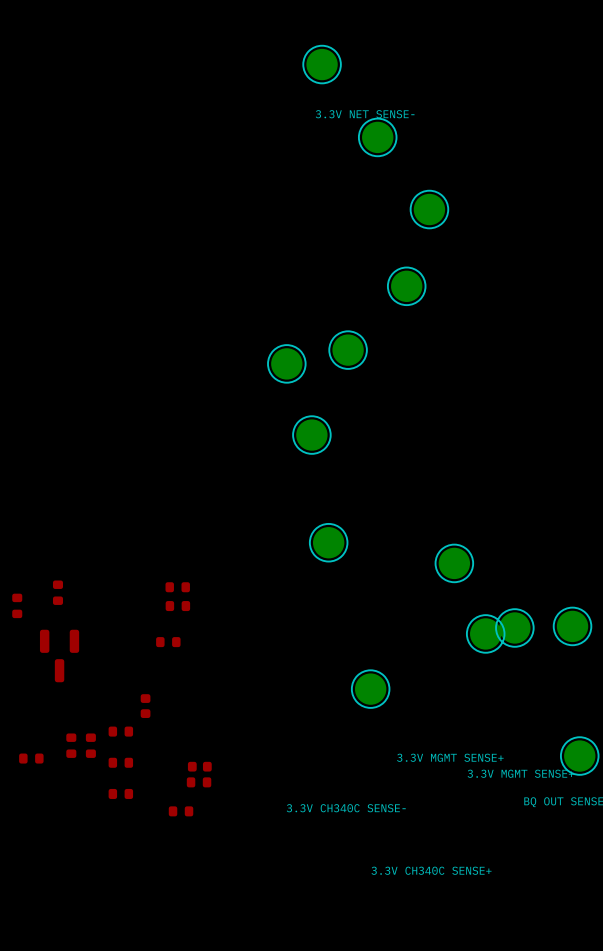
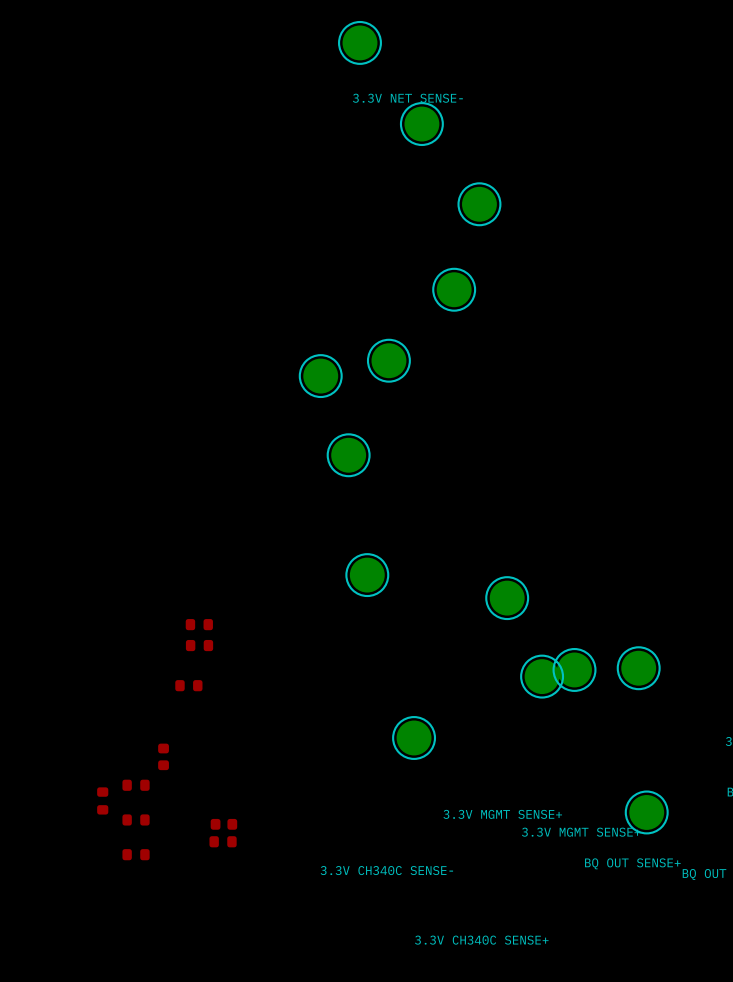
part: (57, 592) -> none
part: (17, 605) -> none
part: (59, 656) -> none
part: (71, 745) -> none
part: (31, 758) -> none
part: (181, 811) -> none

